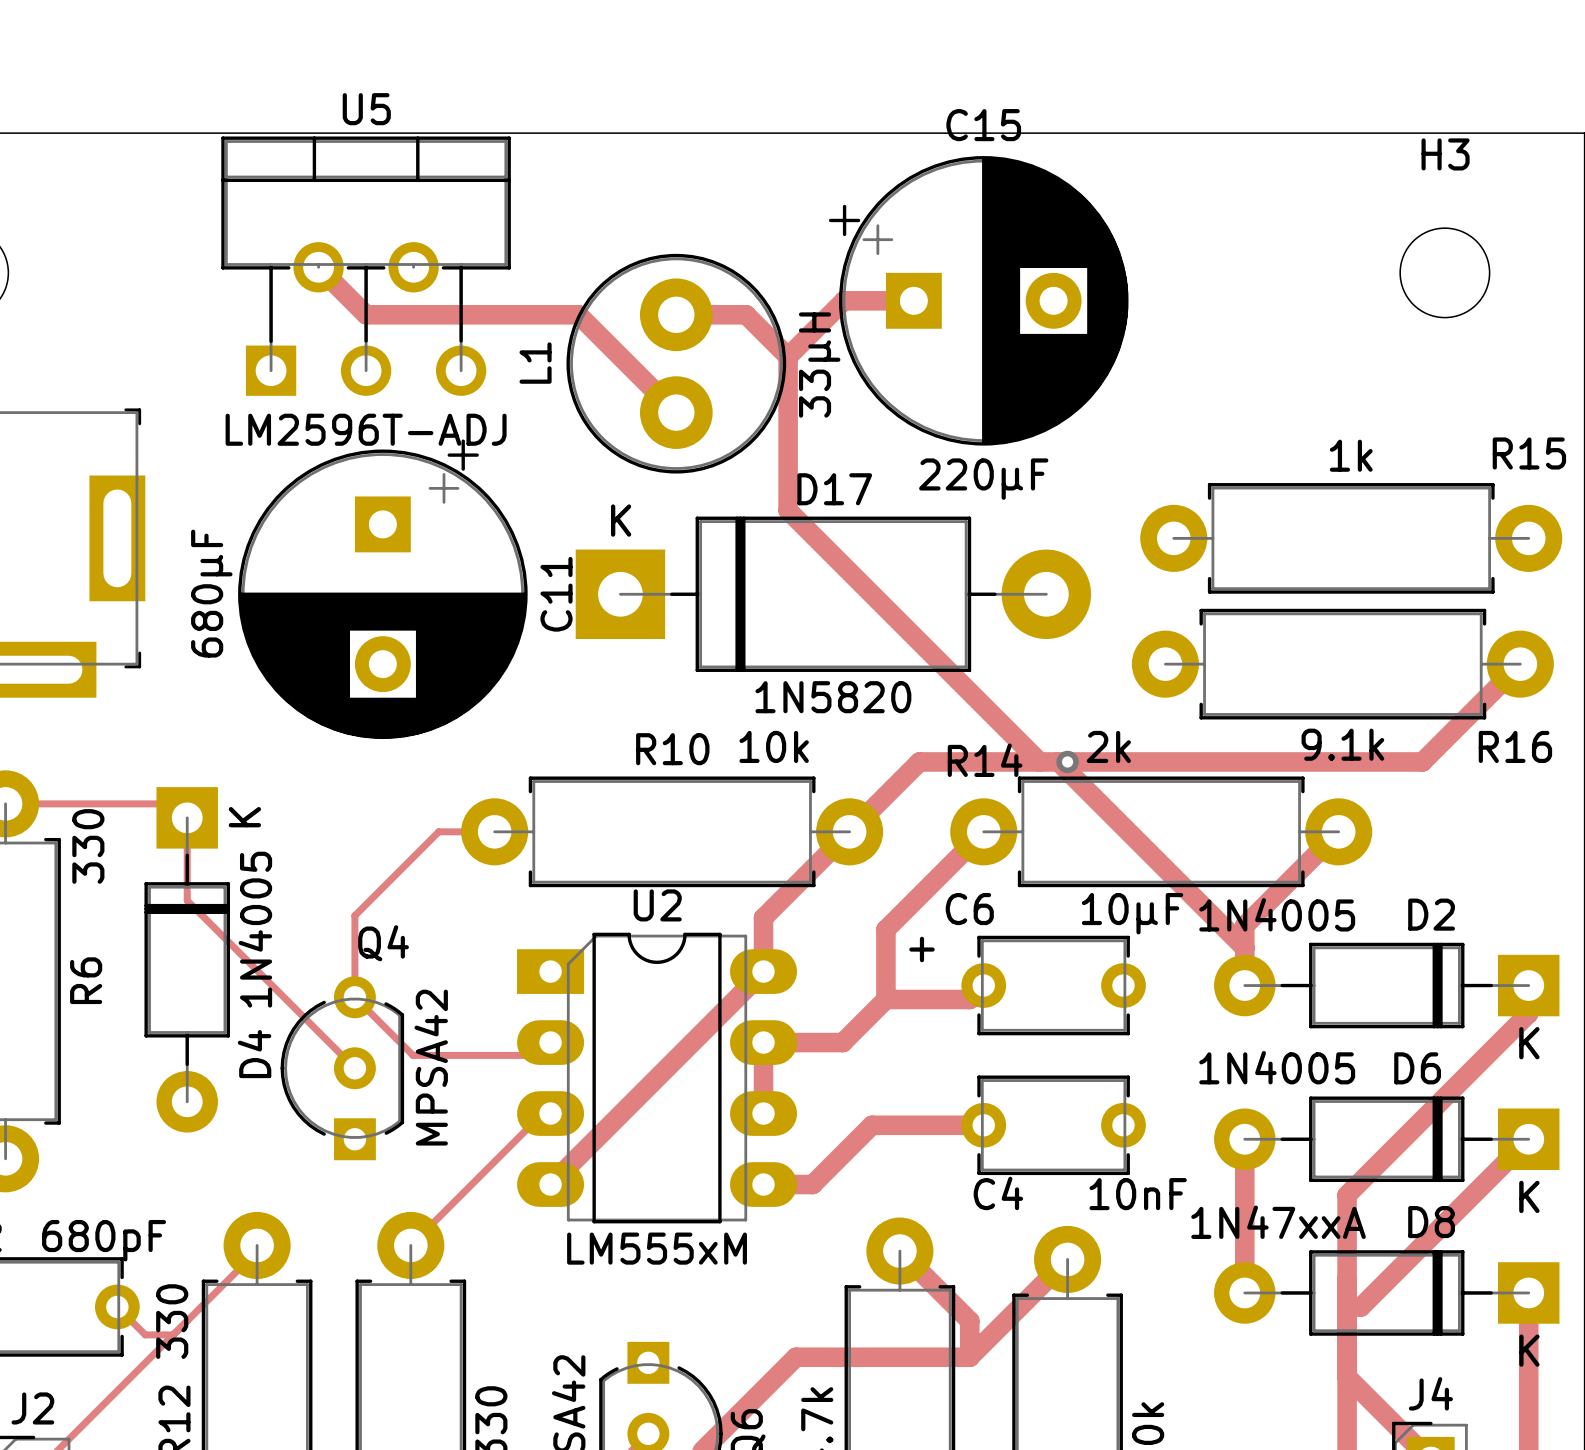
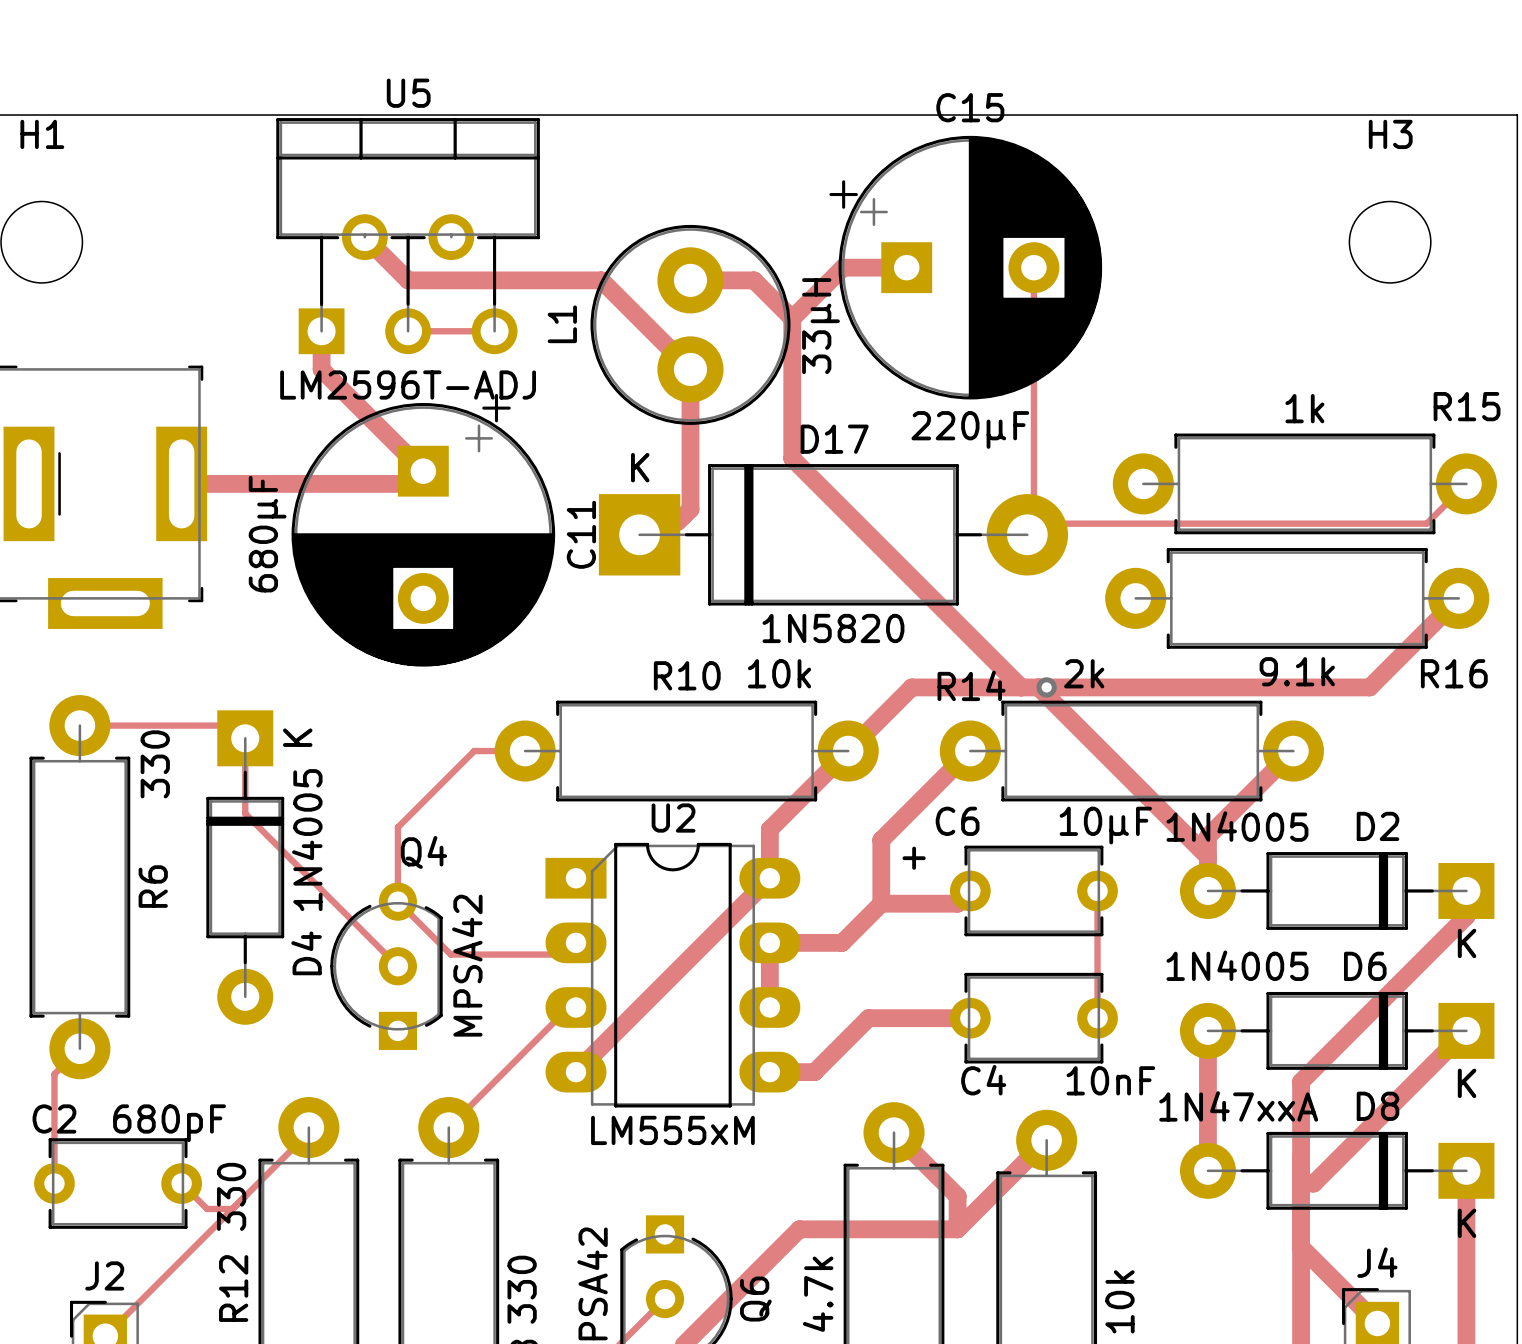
track: none -> (1033, 267) (1033, 528) (1027, 534)
track: none -> (321, 331) (321, 369) (423, 471) (410, 483) (181, 483)
track: none -> (408, 331) (494, 331)
track: none -> (690, 369) (690, 509) (677, 522)
track: none -> (1466, 483) (1426, 523) (1033, 523)
track: none -> (1097, 890) (1097, 1018)

